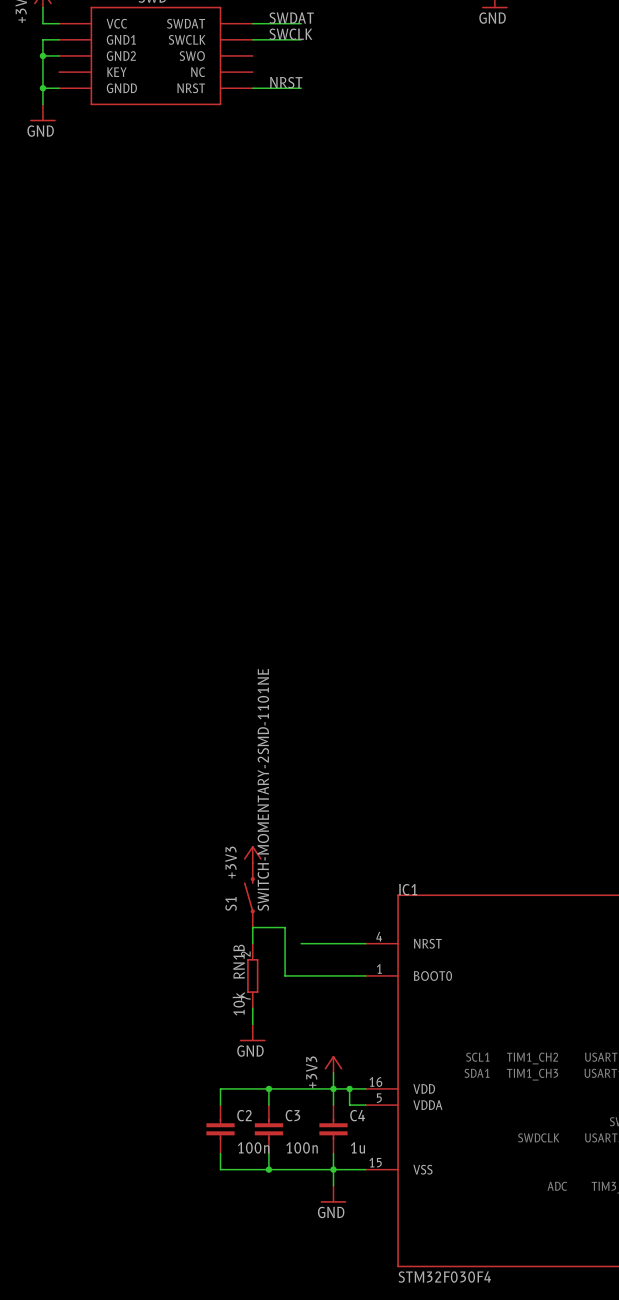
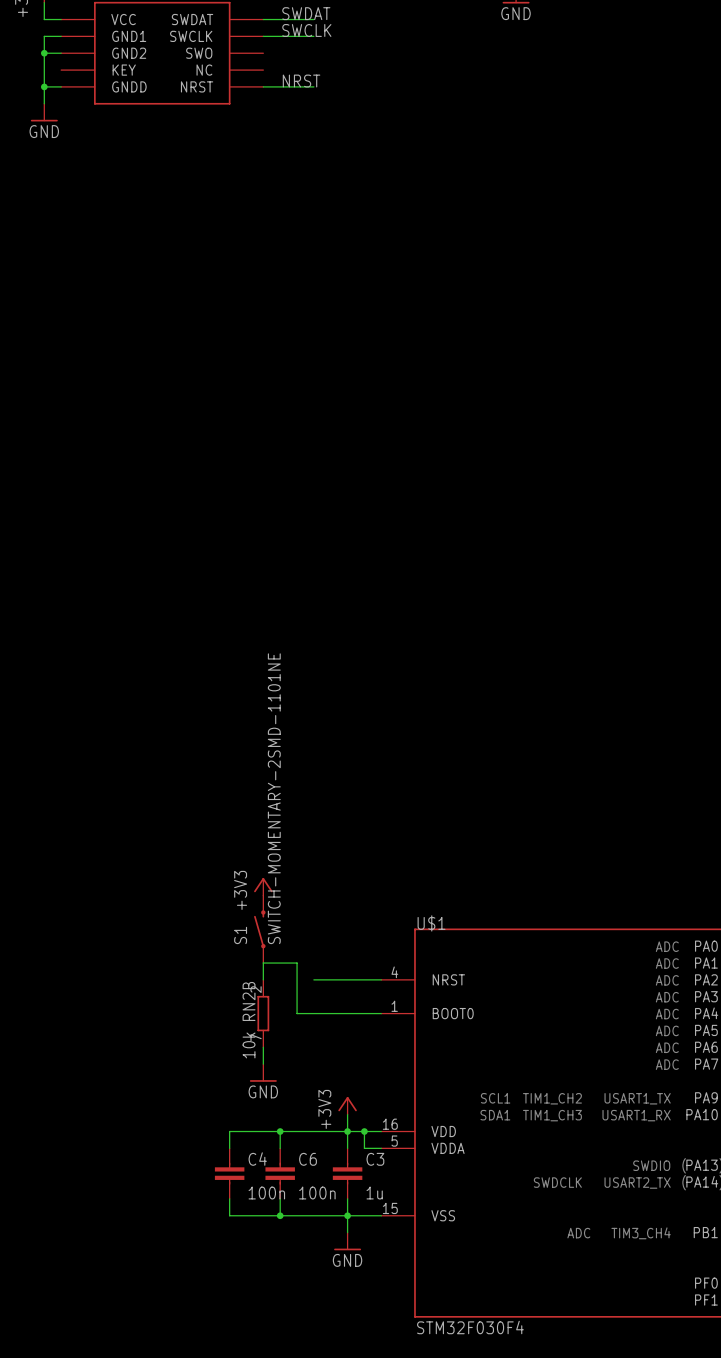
IC1 name: IC1 (408, 889) -> U$1 (431, 923)
RN1B name: RN1B (239, 961) -> RN2B (249, 1001)
C2 name: C2 (244, 1115) -> C4 (257, 1159)
C3 name: C3 (292, 1115) -> C6 (308, 1159)
C4 name: C4 (357, 1115) -> C3 (375, 1159)

